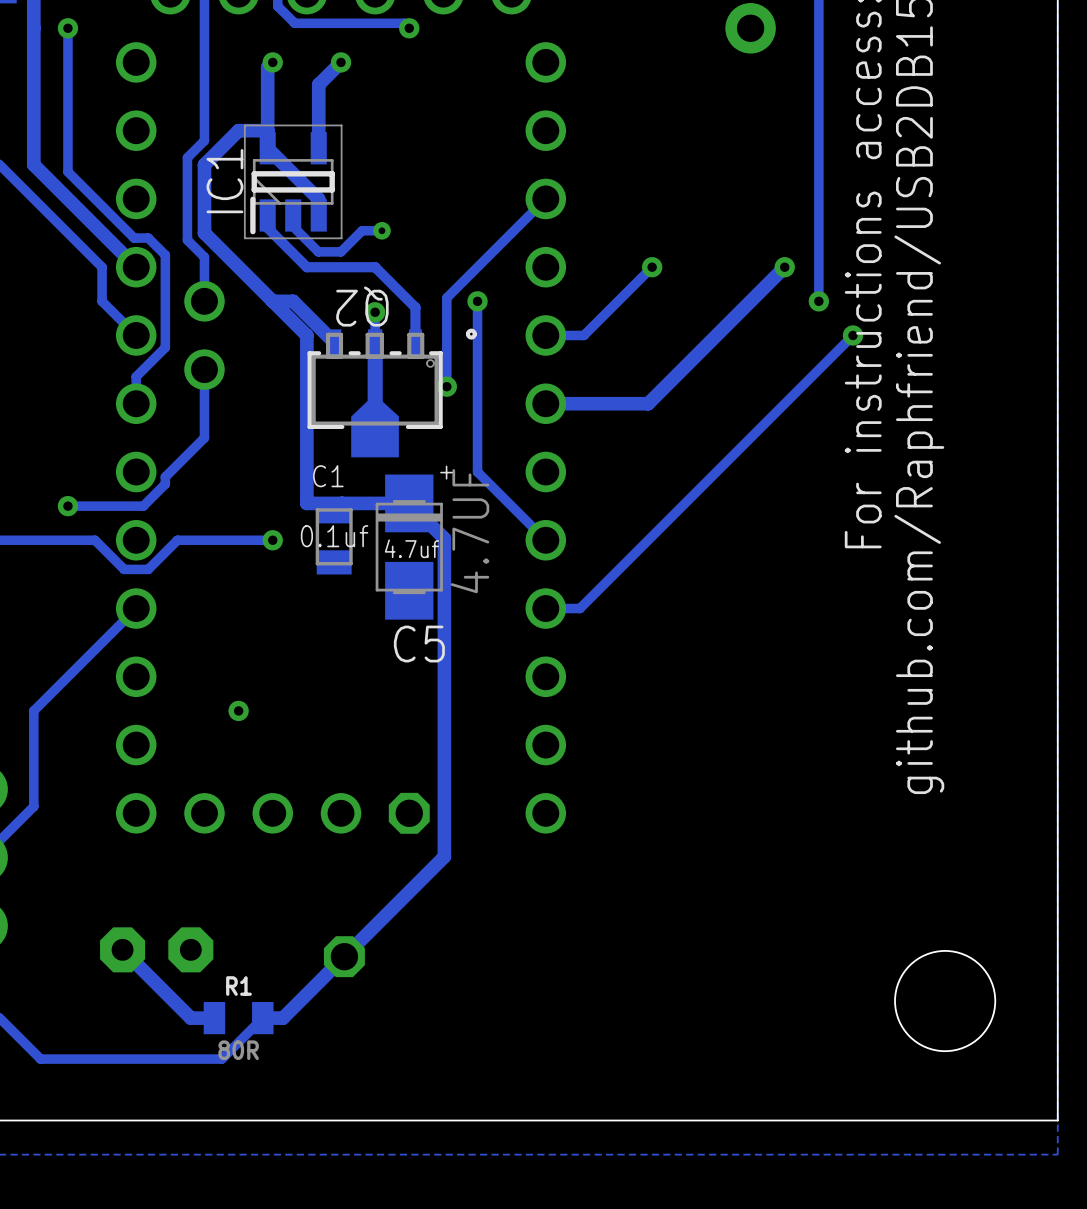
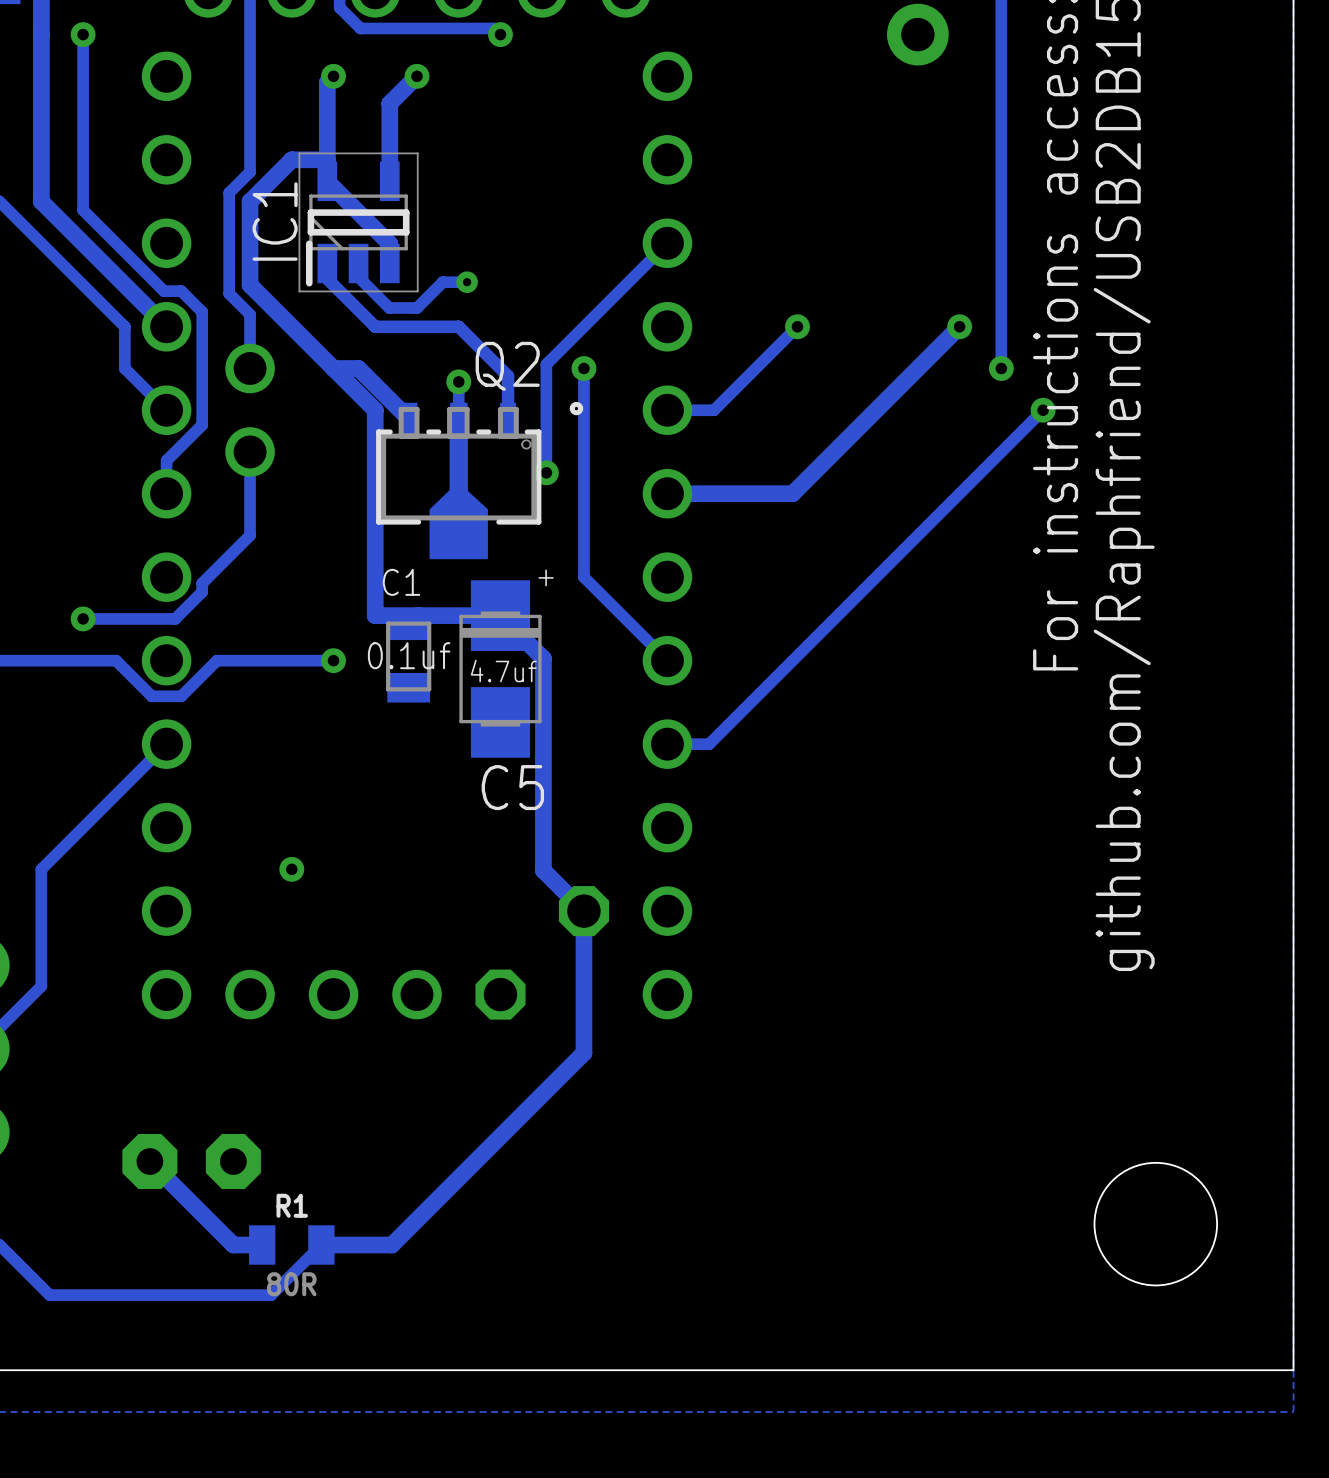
Q2 name rotation: 0° (362, 306) -> 180° (507, 366)
C5 value: 4.7UF (470, 531) -> none
track: (444, 711) (444, 856) (282, 1018) -> (543, 870) (583, 911) (583, 1053) (391, 1245) (346, 1245)
part position: (344, 956) -> (583, 911)

